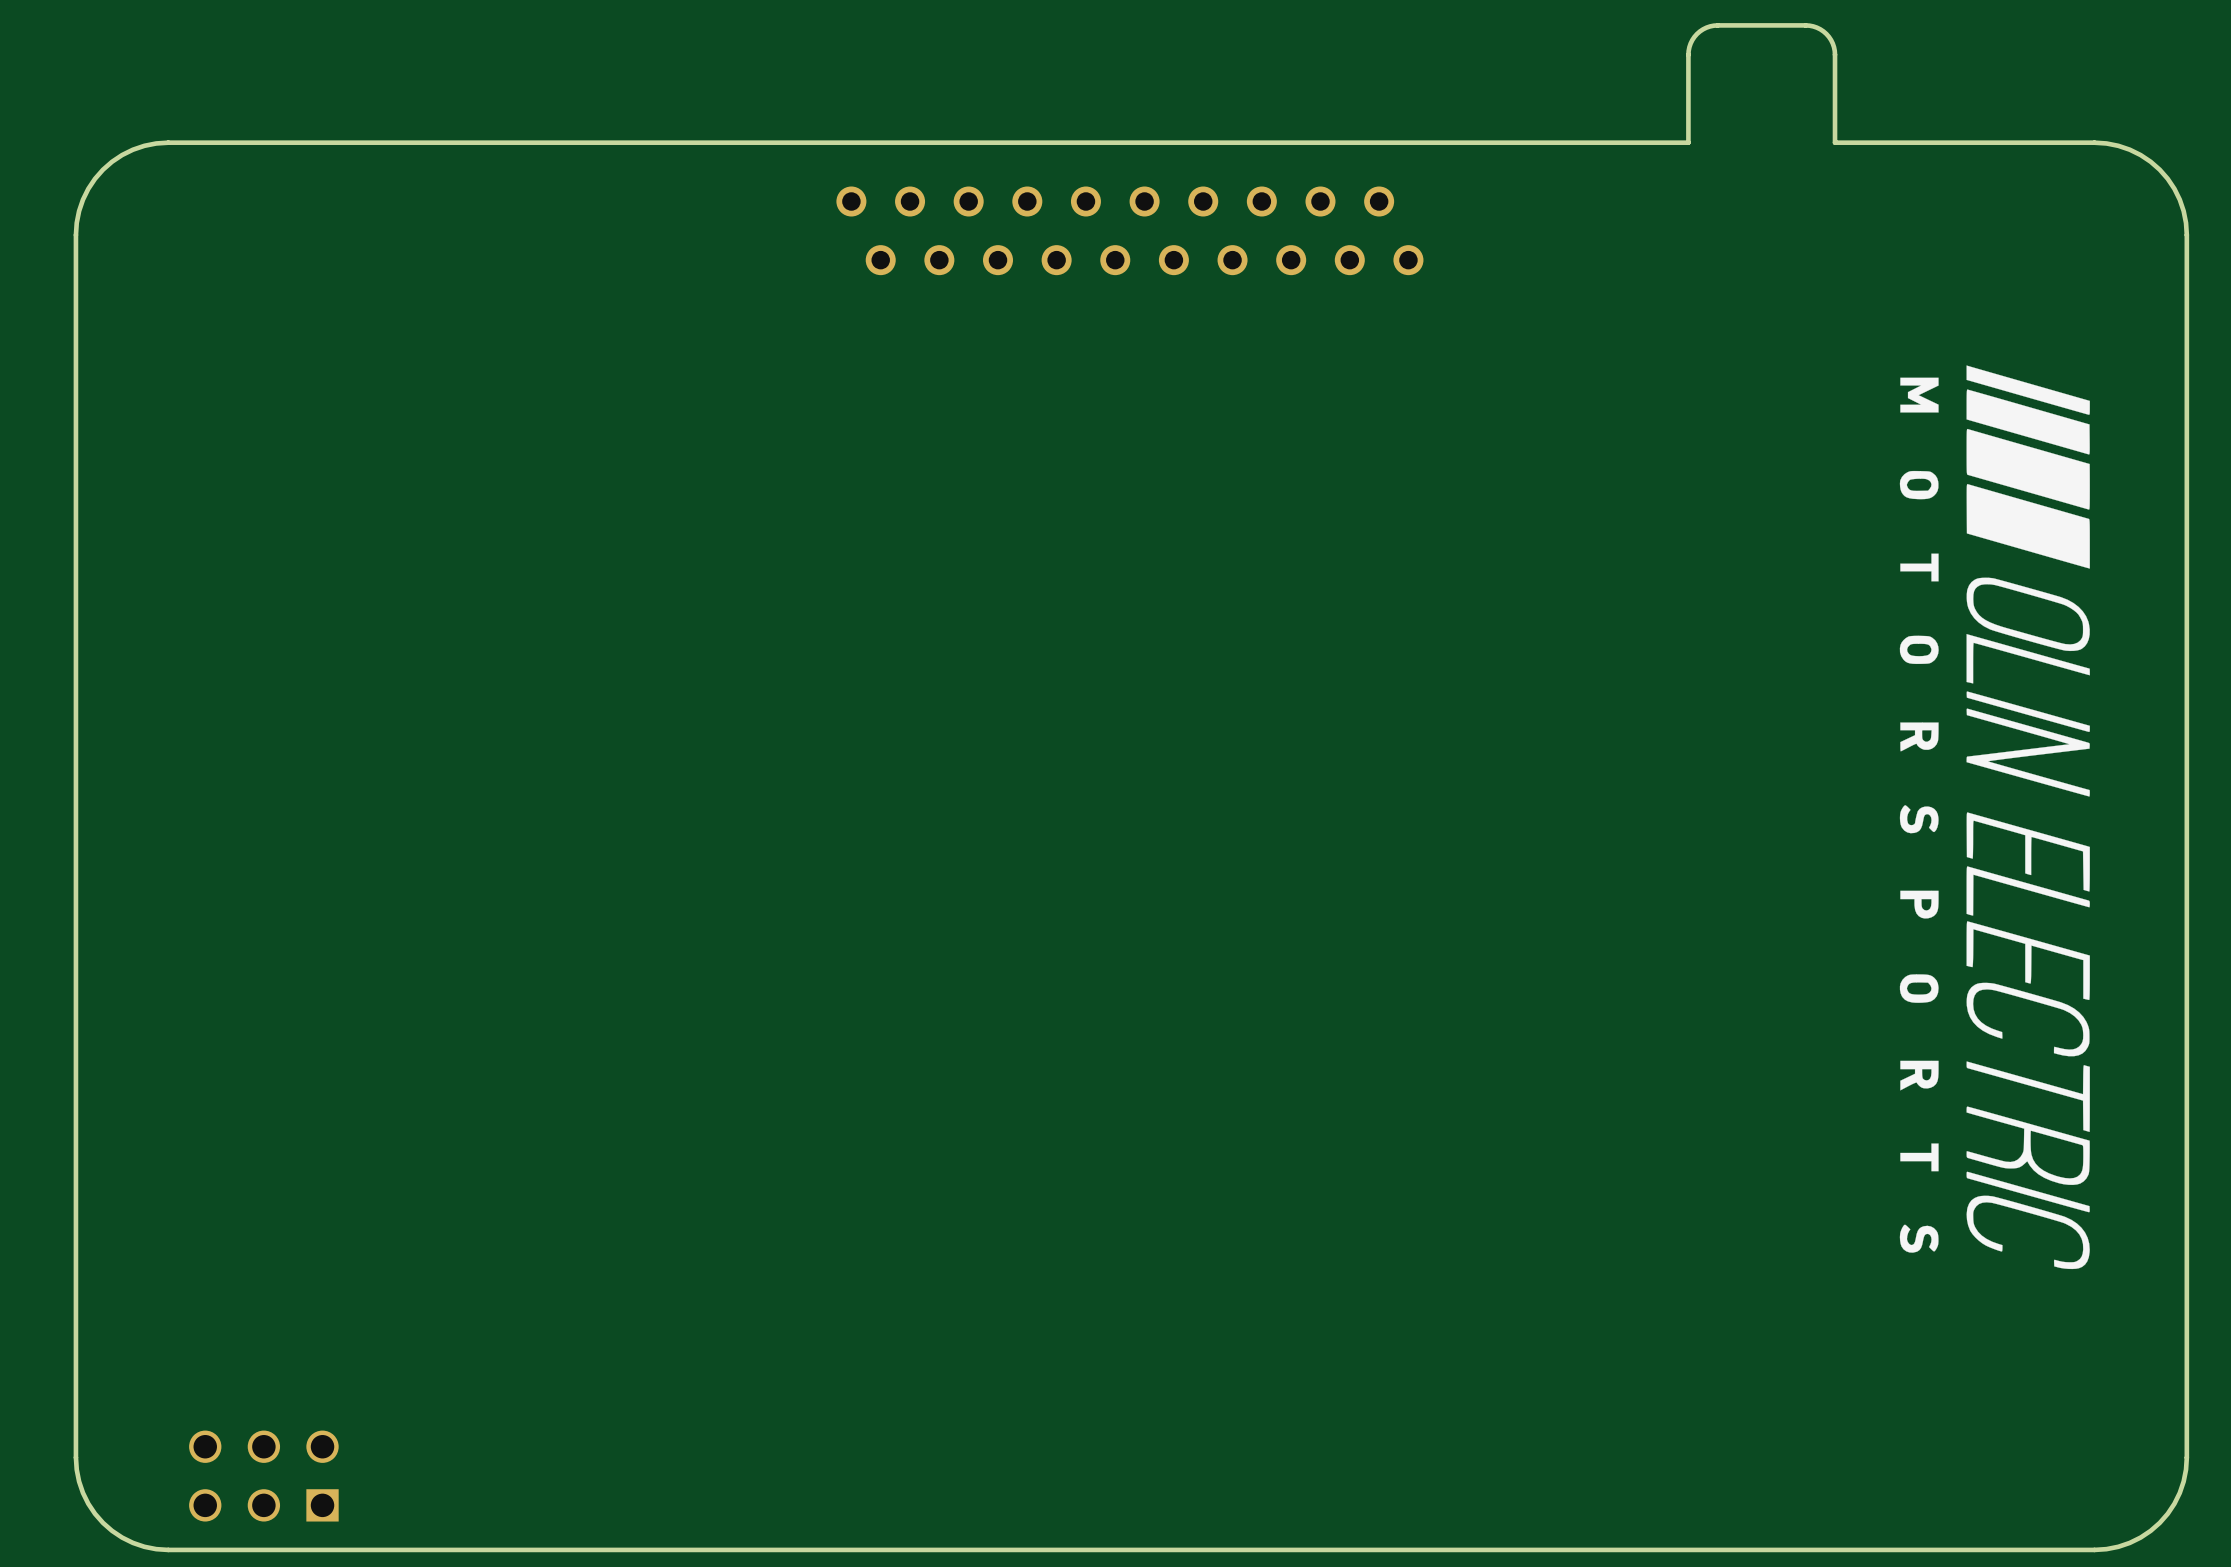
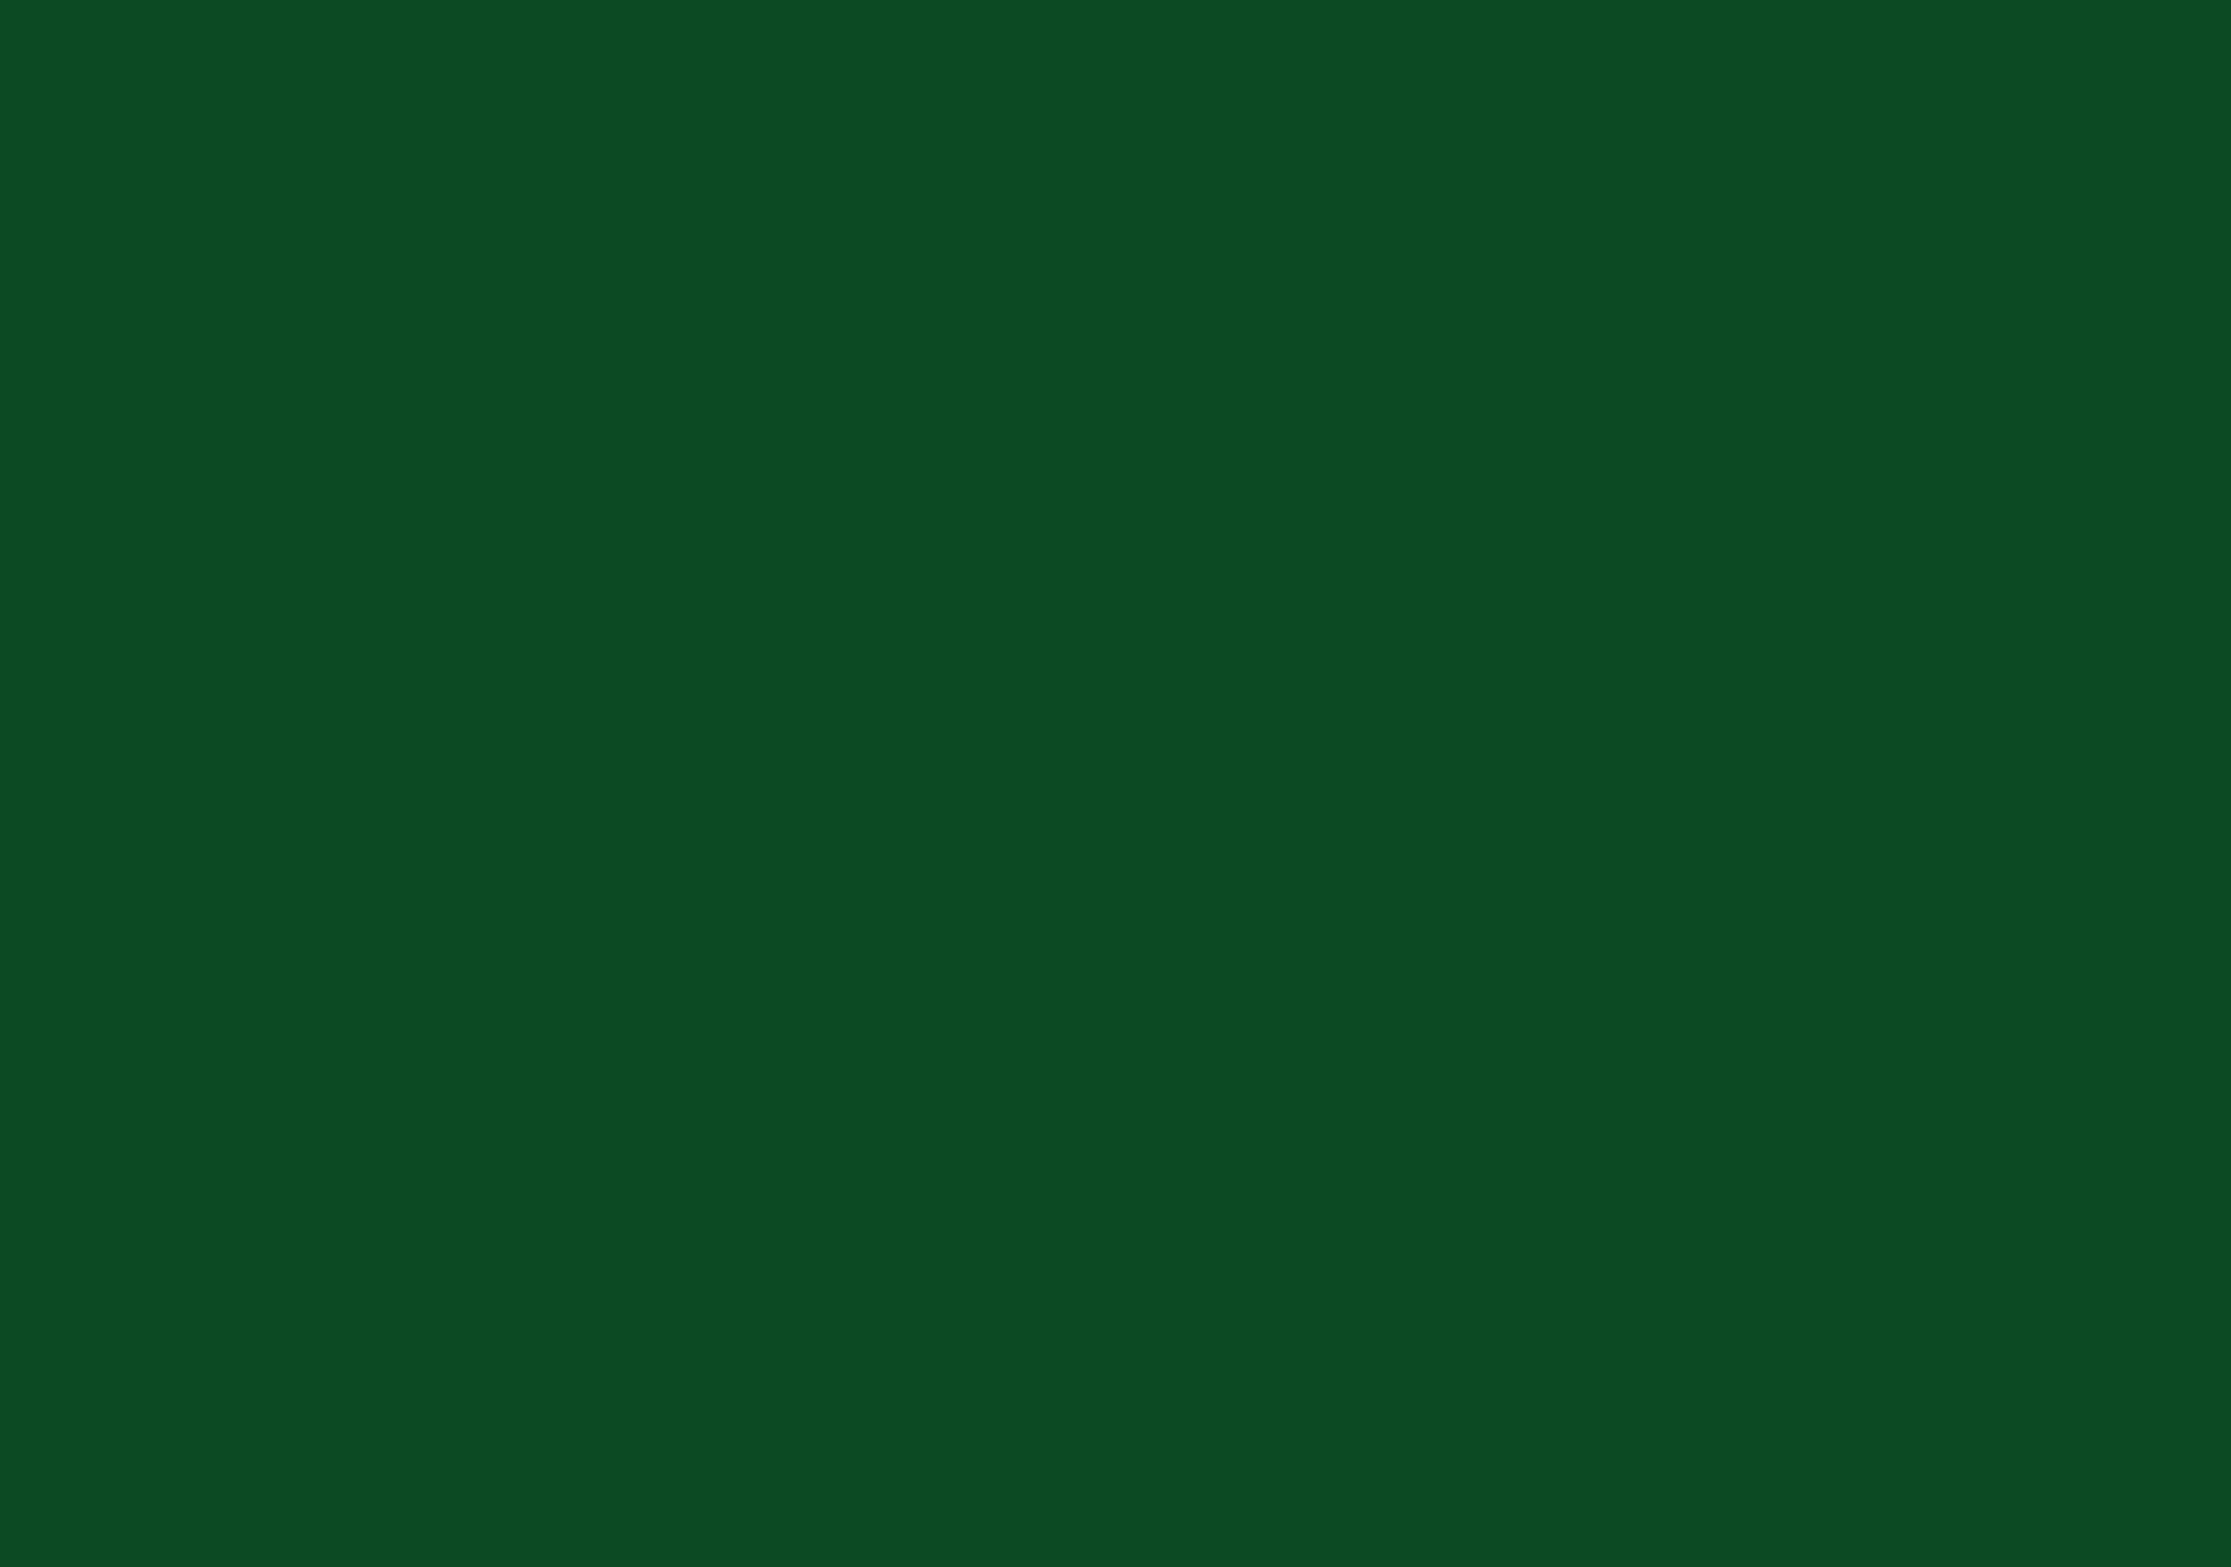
board edge: (1805, 25) (1713, 25) (1697, 34) (1688, 50) (1688, 142) (168, 142) (156, 143) (132, 149) (112, 161) (102, 169) (88, 188) (79, 211) (75, 235) (75, 1457) (79, 1481) (82, 1492) (95, 1513) (112, 1530) (132, 1542) (144, 1546) (168, 1549) (2094, 1549) (2118, 1546) (2129, 1542) (2150, 1530) (2167, 1513) (2179, 1492) (2183, 1481) (2186, 1457) (2186, 235) (2183, 211) (2174, 188) (2159, 169) (2140, 155) (2129, 149) (2106, 143) (1835, 142) (1834, 47) (1823, 31) (1805, 25) -> none
part: (1129, 230) -> none
drawing: [1899, 365, 2090, 1270] -> none
part: (263, 1476) -> none

